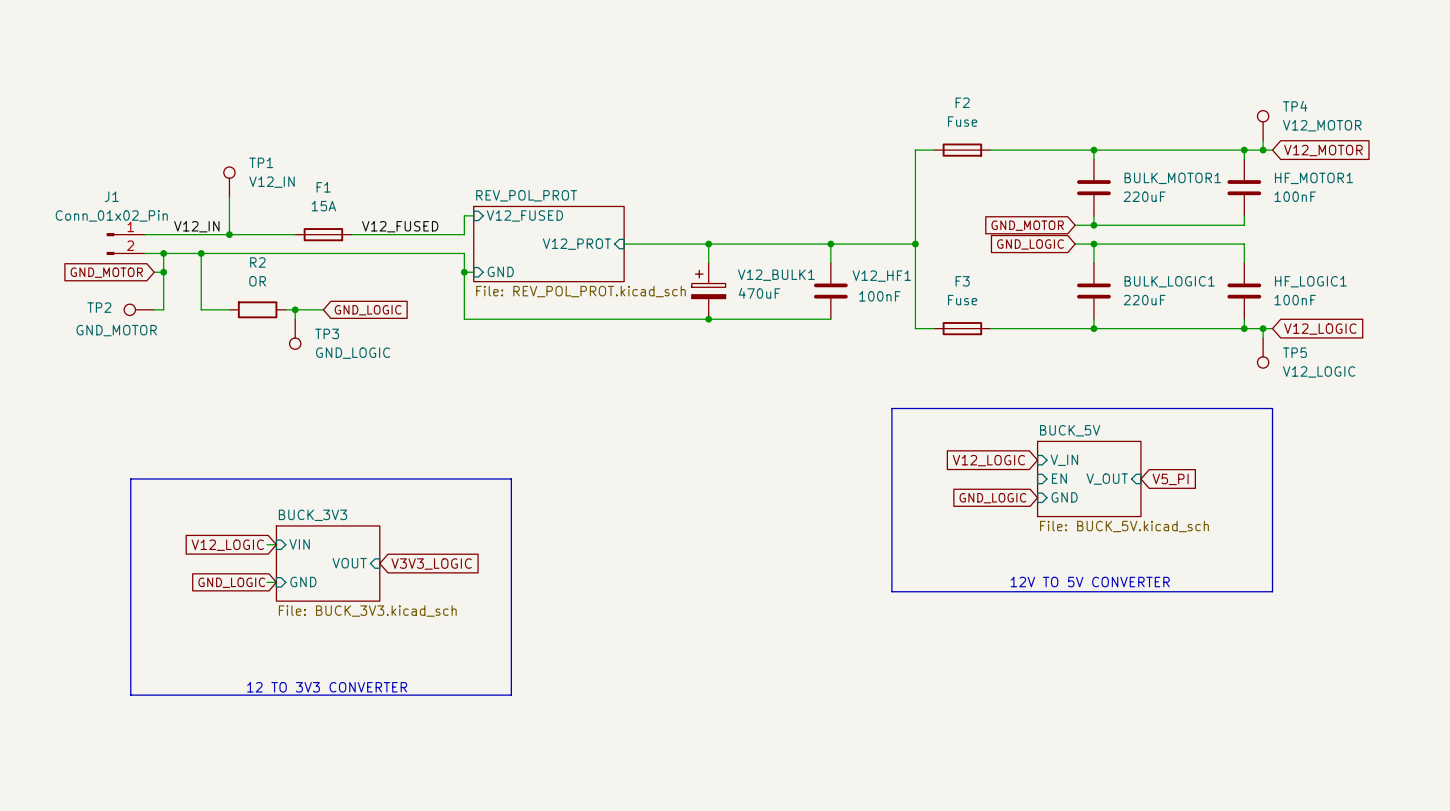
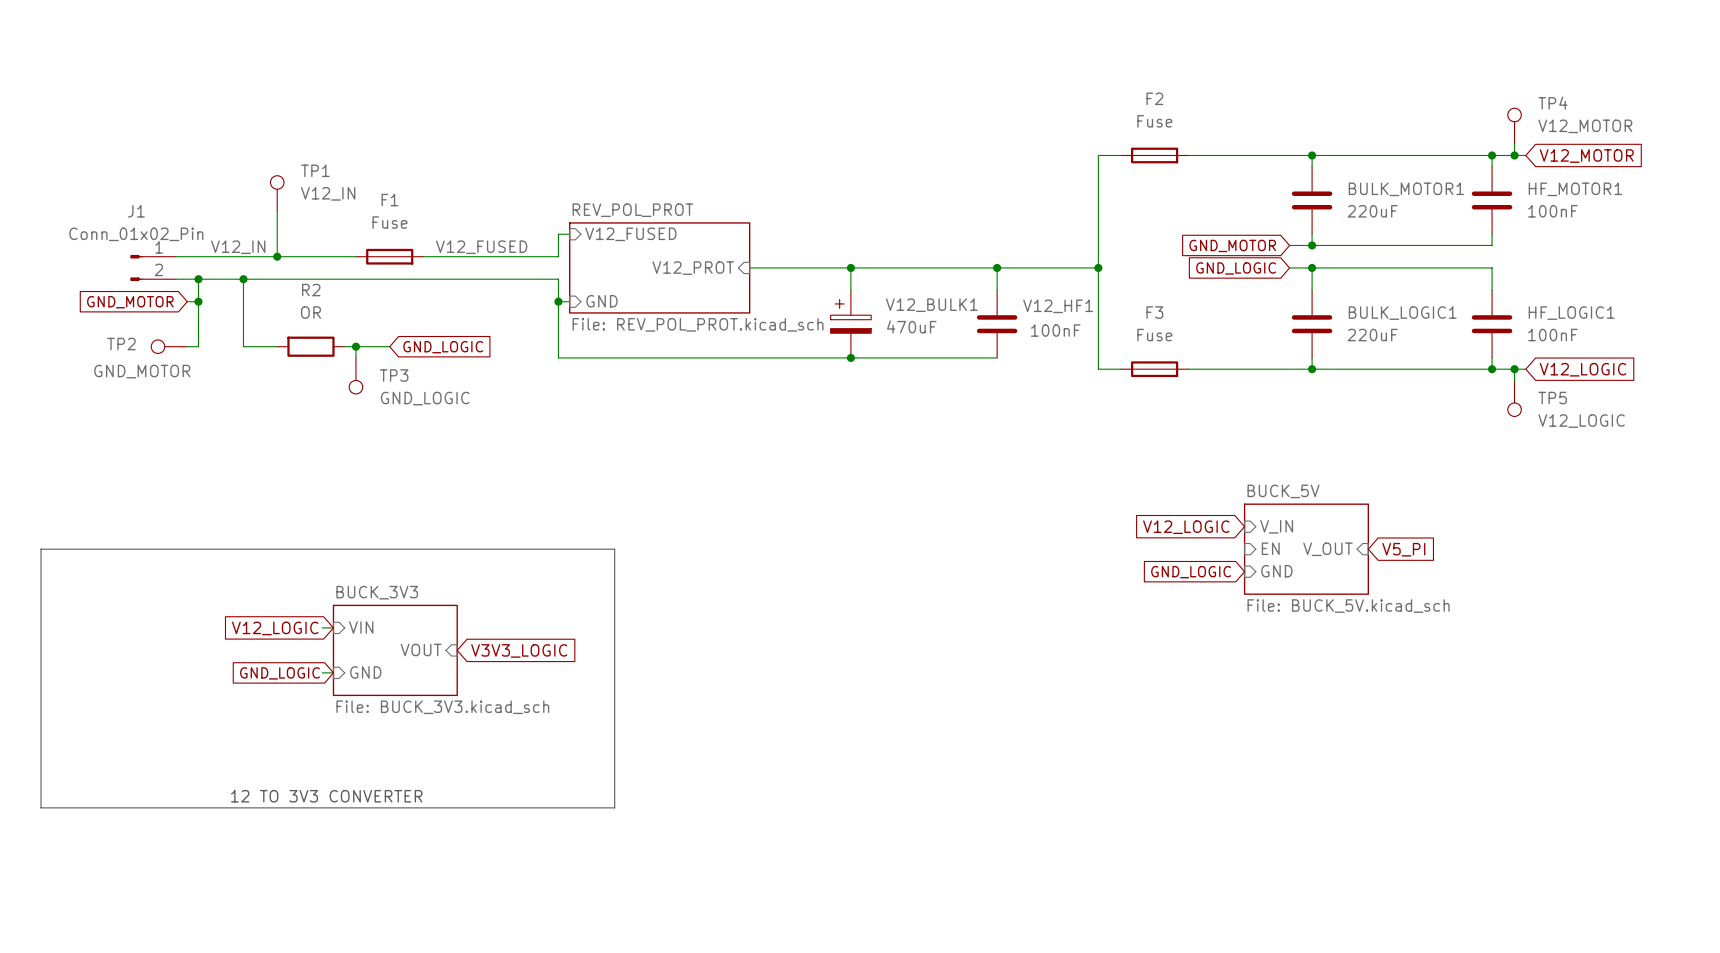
F1 value: 15A (323, 206) -> Fuse (389, 222)
line: (891, 408) (1272, 408) (1272, 591) (891, 591) (891, 408) -> none
line: (130, 478) (130, 695) -> (159, 549) (41, 549) (41, 807) (159, 807)
text: 12V TO 5V CONVERTER (1090, 582) -> none
text position: 12 TO 3V3 CONVERTER (327, 687) -> 12 TO 3V3 CONVERTER (326, 796)

